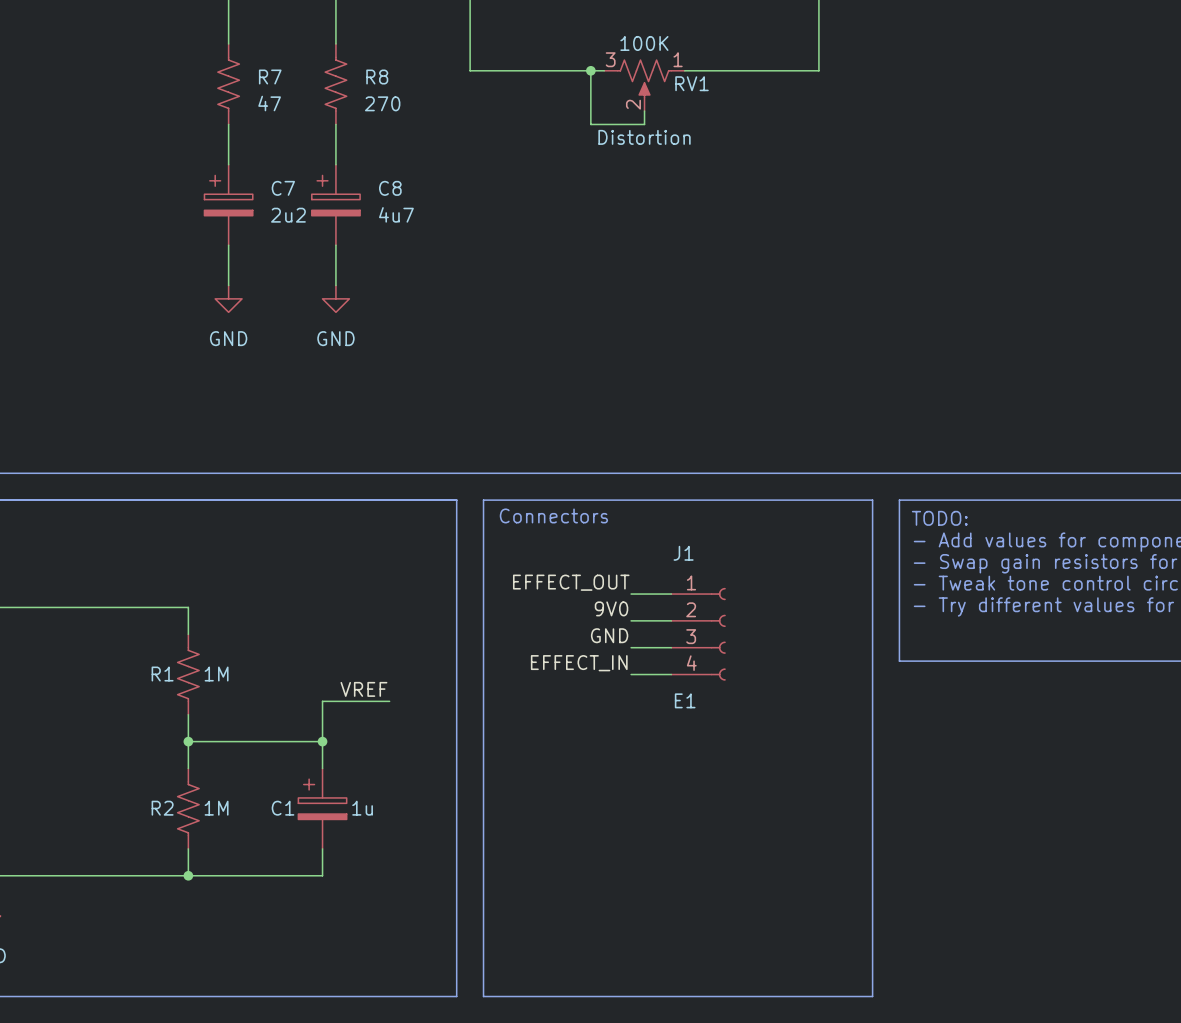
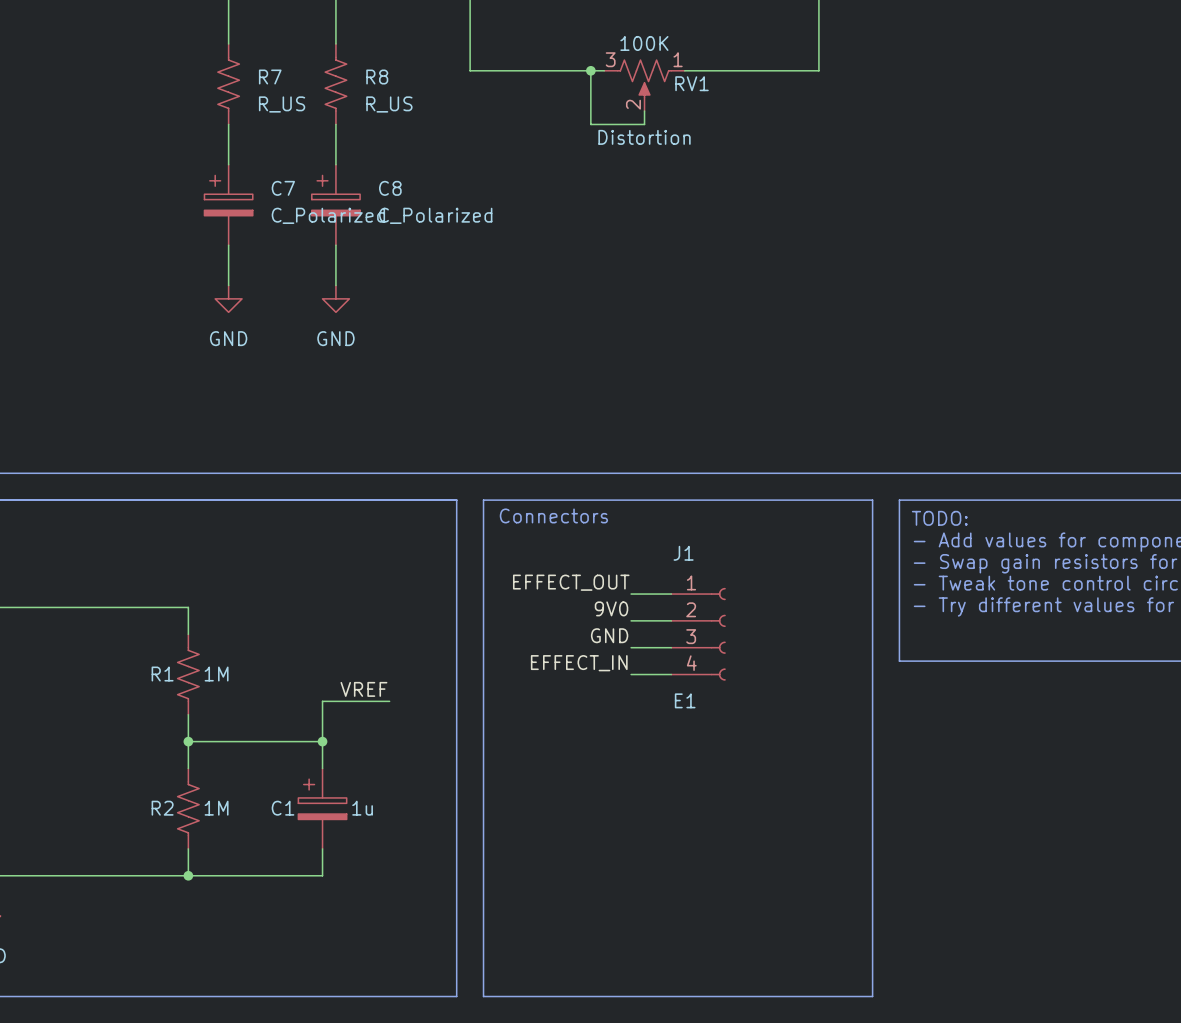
R7 value: 47 (269, 103) -> R_US (282, 104)
R8 value: 270 (382, 103) -> R_US (389, 104)
C8 value: 4u7 (396, 214) -> C_Polarized (435, 215)
C7 value: 2u2 (288, 215) -> C_Polarized (328, 215)

